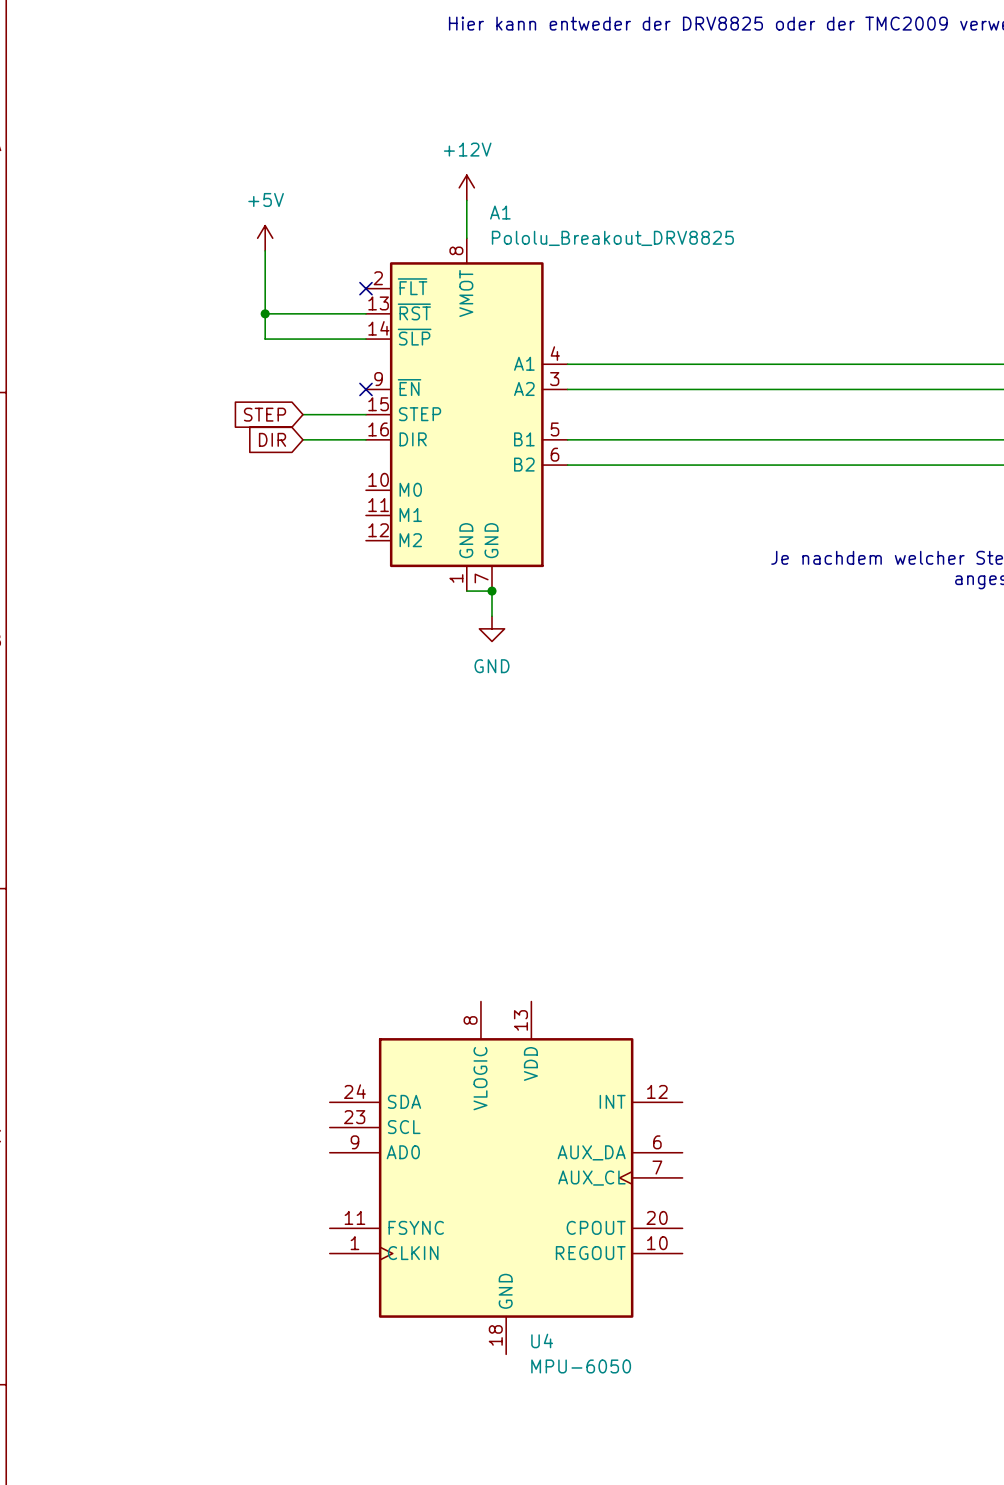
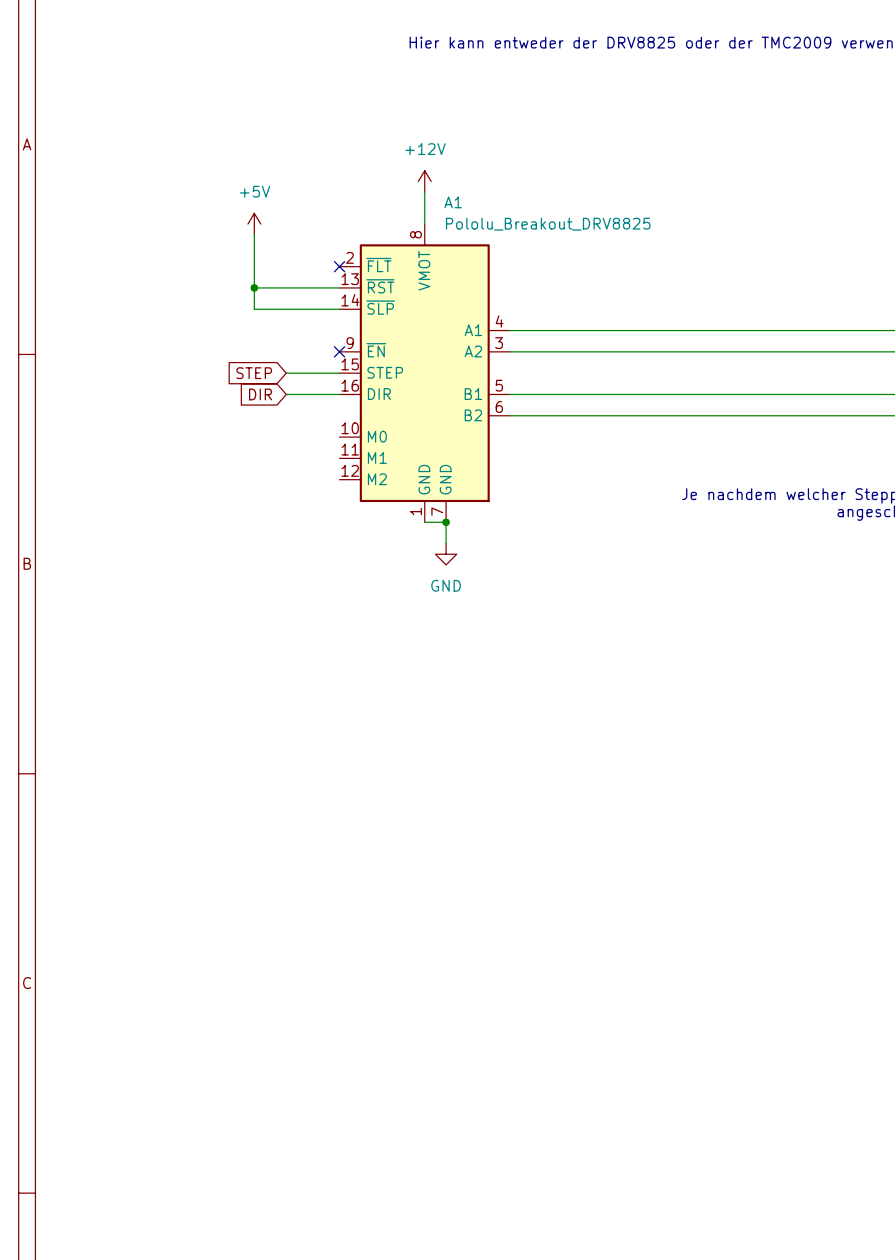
U4: MPU-6050 (506, 1177) -> none

